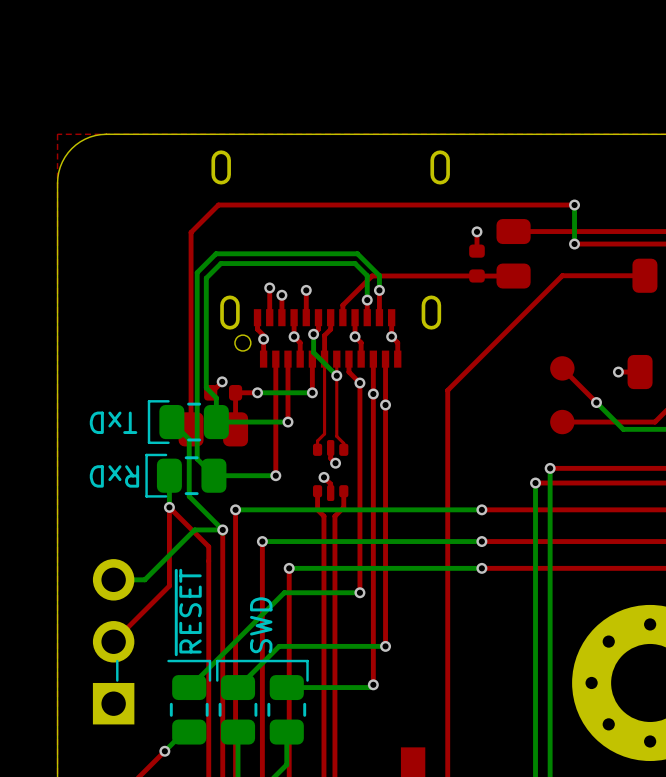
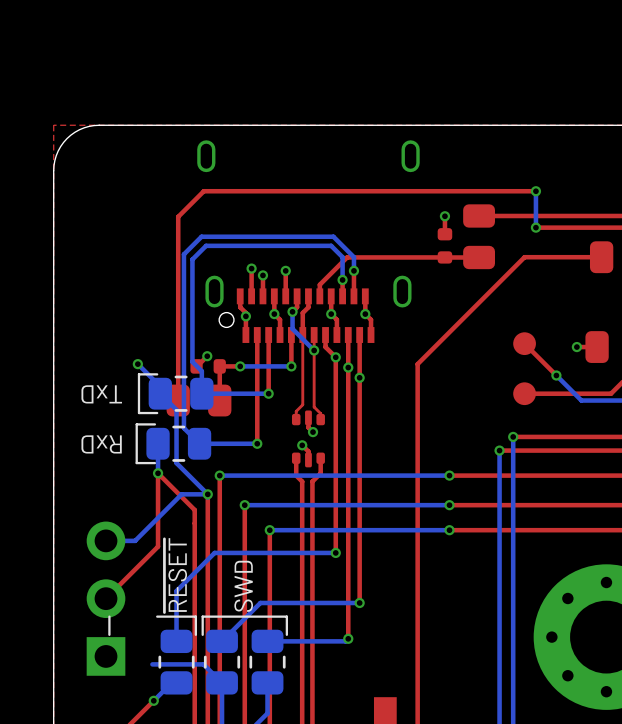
bottom track: none -> (137, 364) (160, 386)
via: none -> (137, 364)
bottom track: (284, 592) (189, 687) -> (265, 552) (214, 552) (176, 591) (176, 641)
bottom track: none -> (152, 664) (203, 664) (222, 682)

